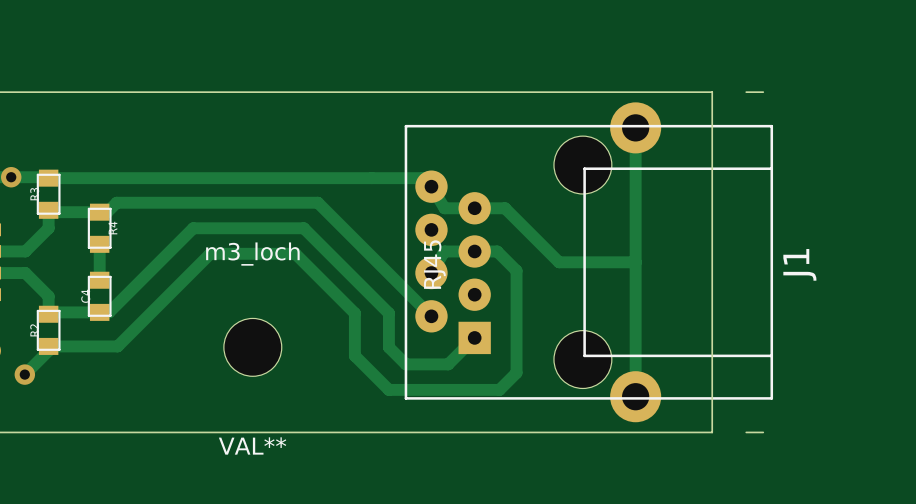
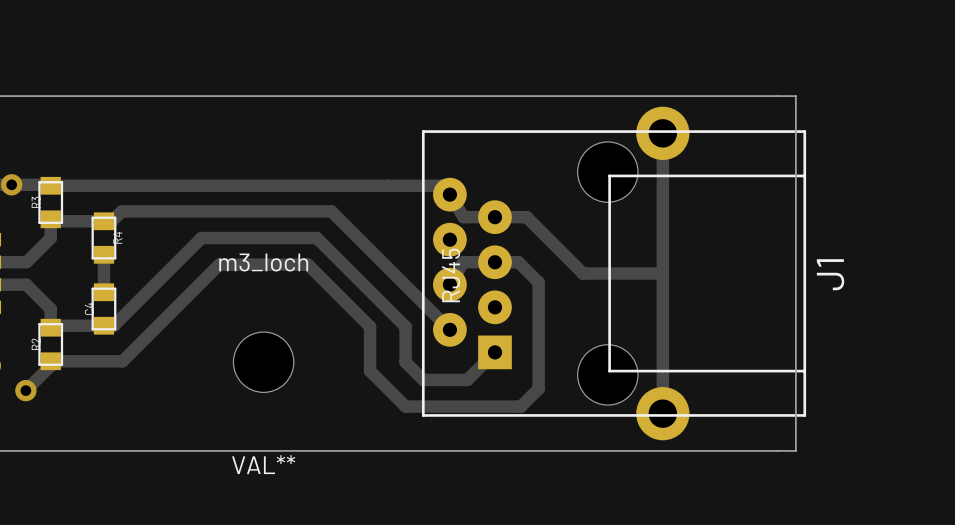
board edge: (712, 92) (712, 432) -> (742, 96) (778, 96)
board edge: none -> (795, 96) (795, 450)
board edge: none -> (742, 450) (778, 450)

